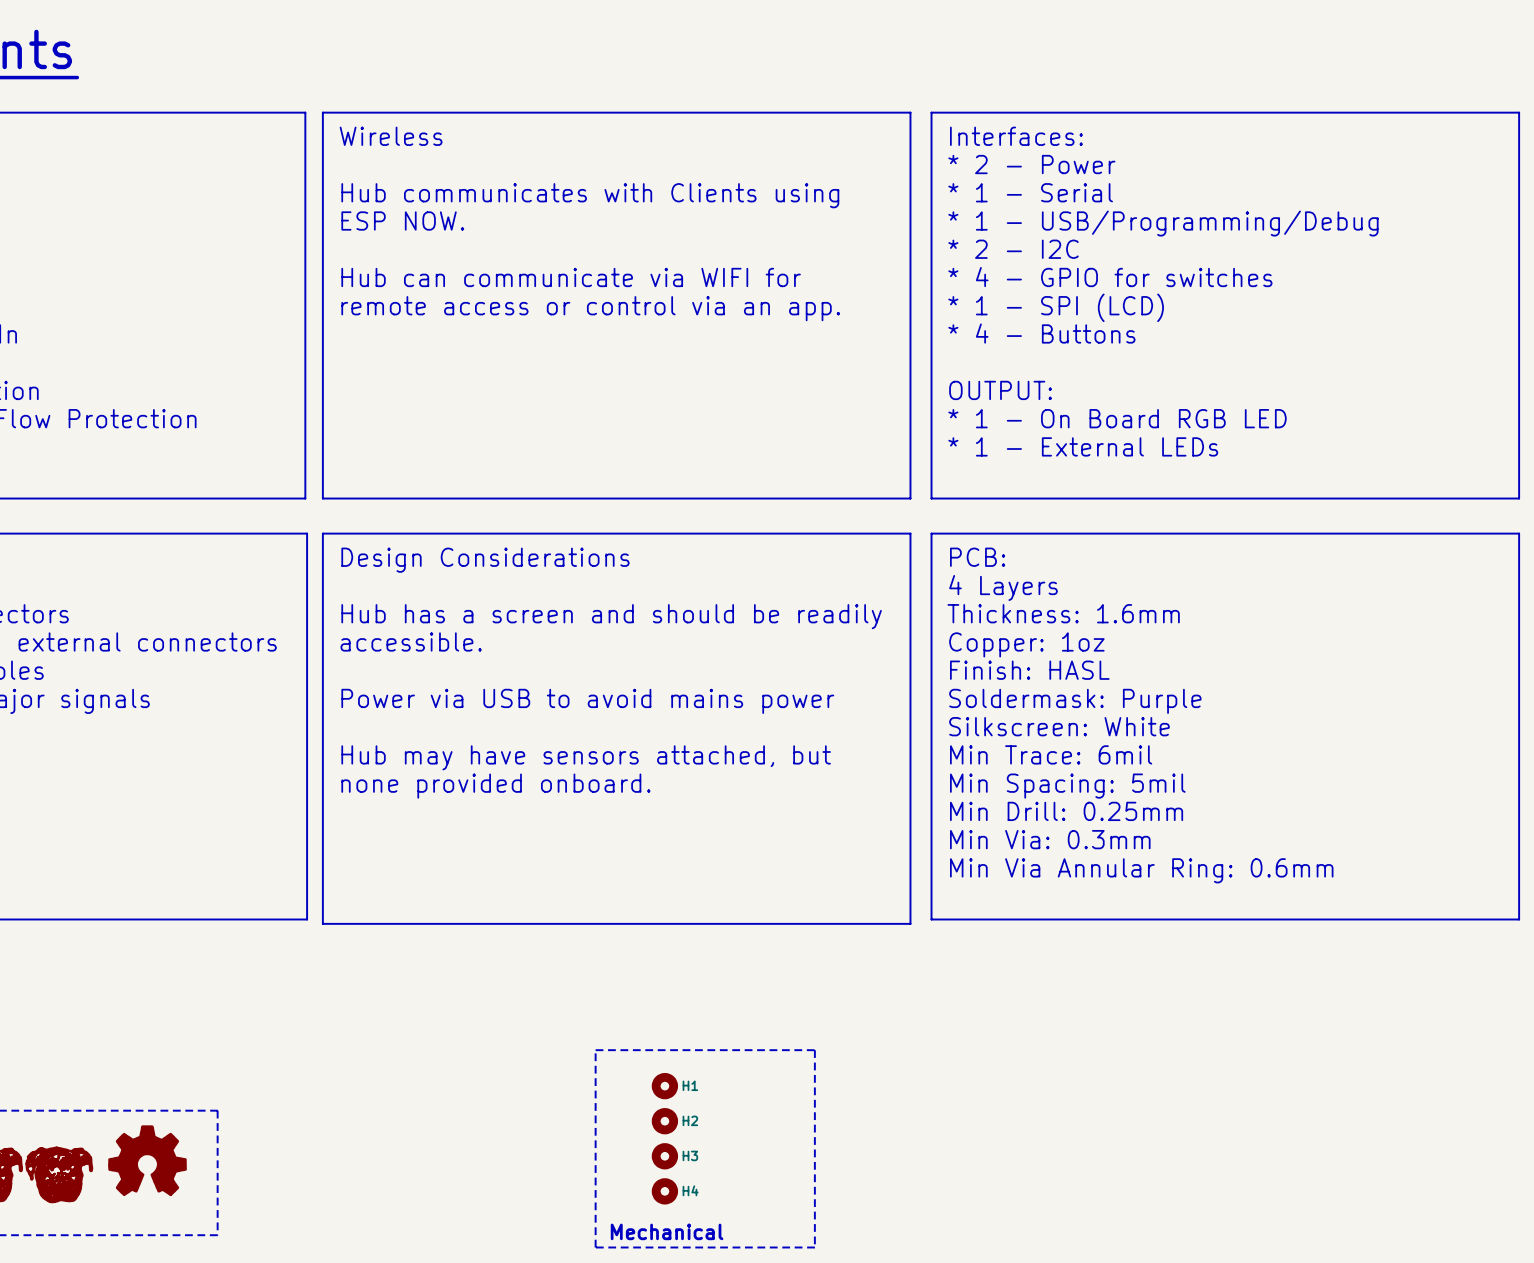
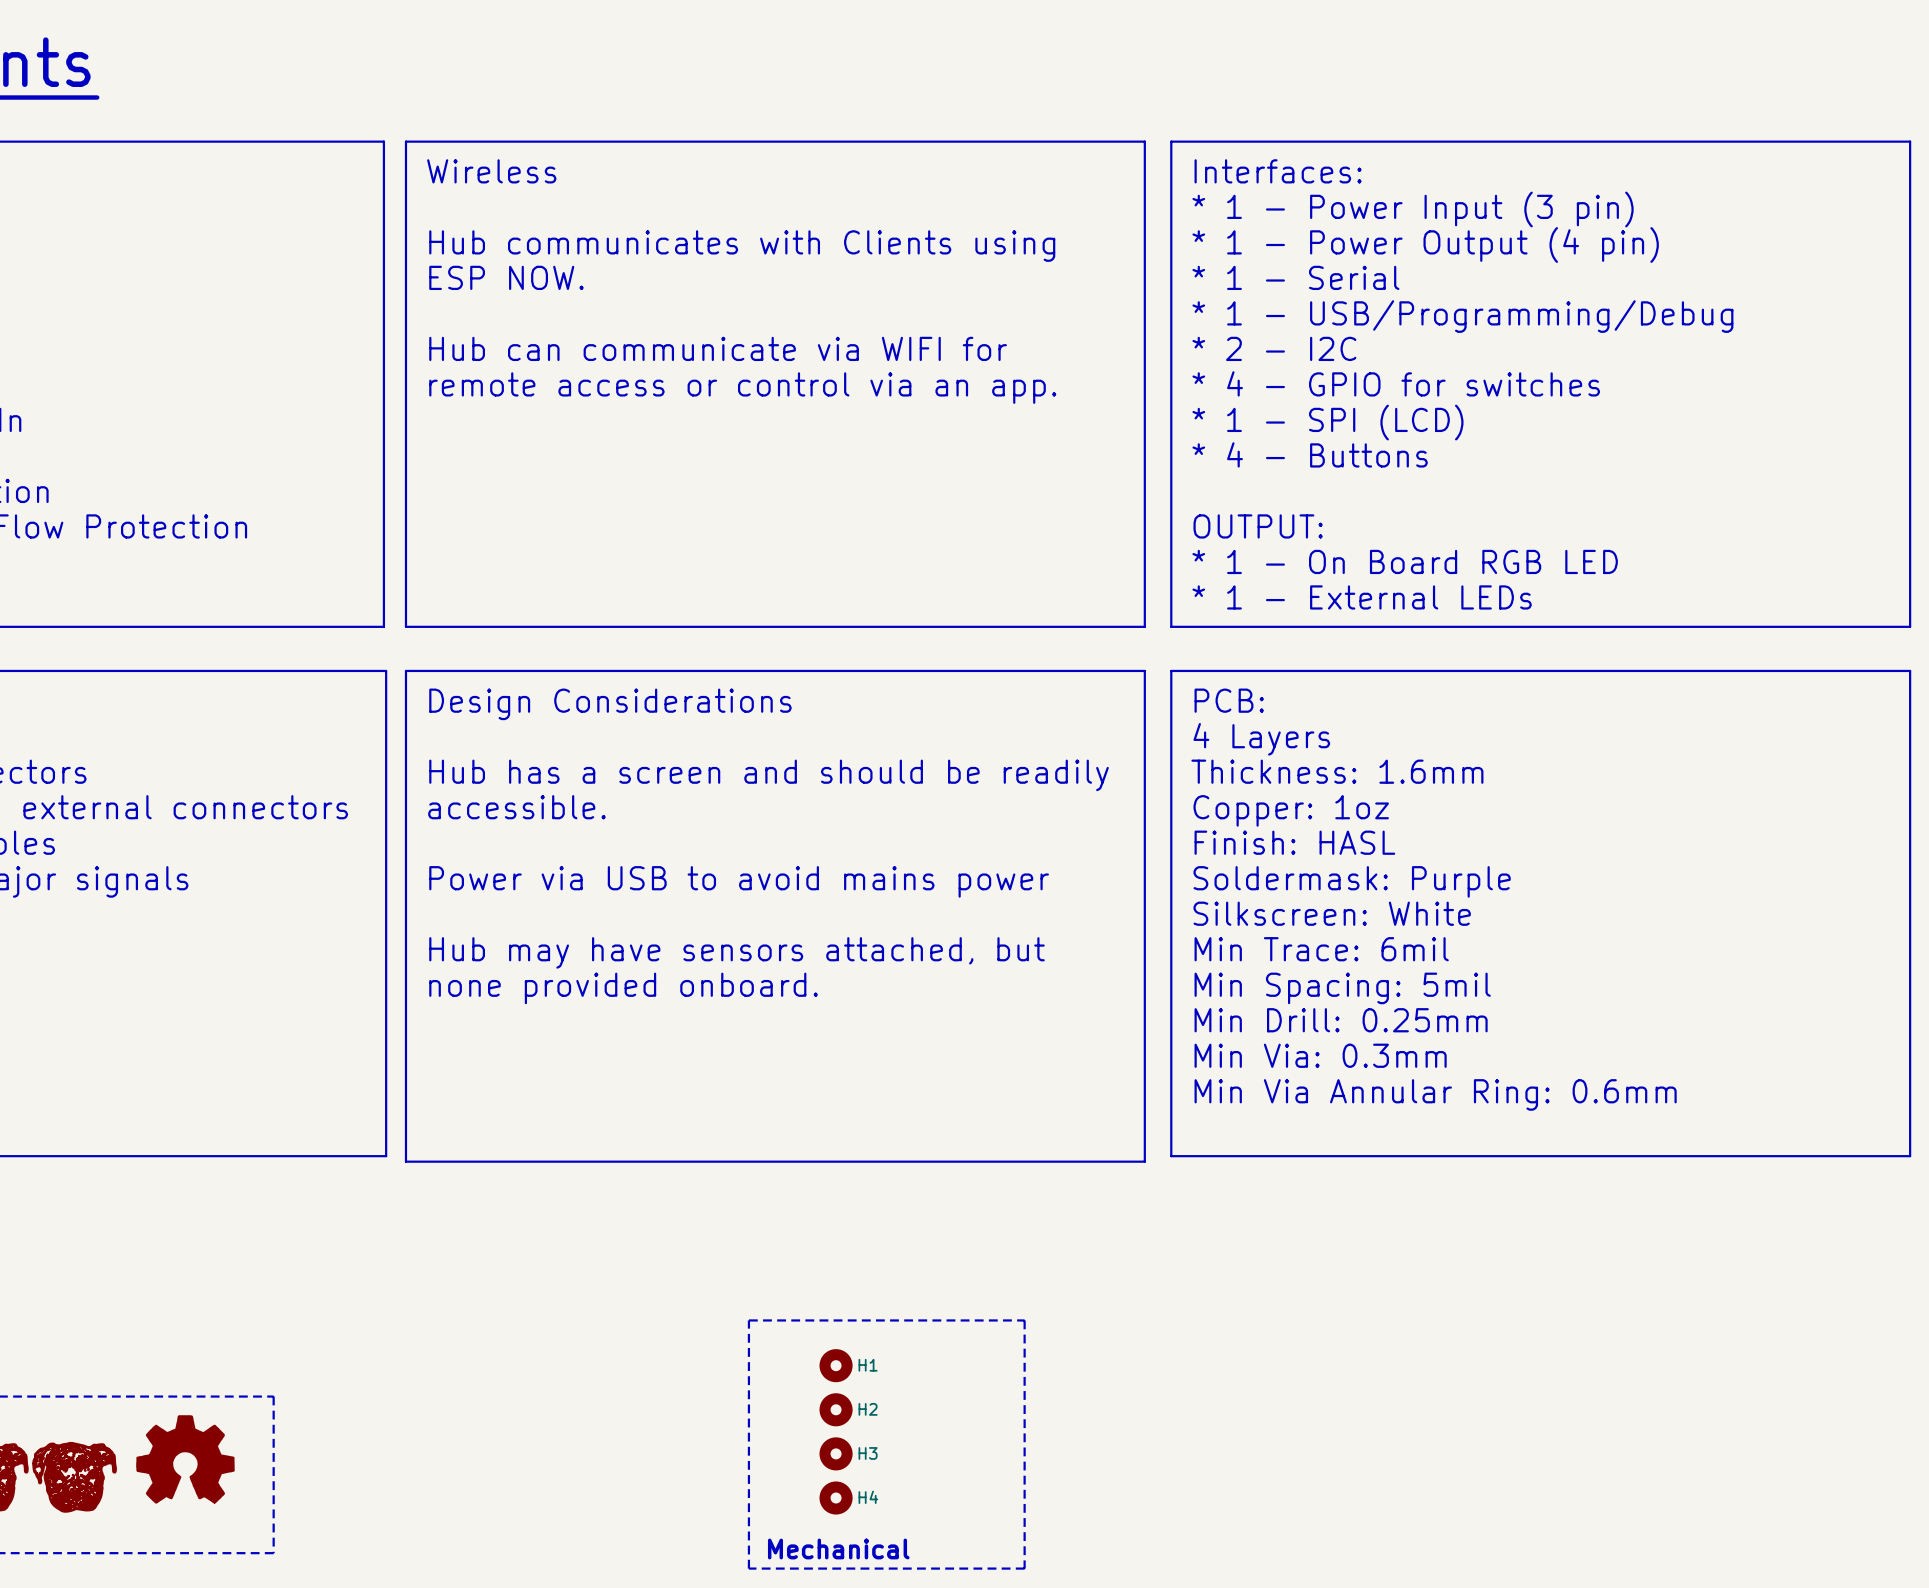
text: * 2 - Power (1031, 164) -> * 1 - Power Input (3 pin) (1413, 209)
text: * 1 - Serial (1030, 192) -> * 1 - Power Output (4 pin) (1425, 245)
text: * 1 - USB/Programming/Debug (1163, 223) -> * 1 - Serial (1295, 277)
text: * 2 - I2C (1013, 249) -> * 1 - USB/Programming/Debug (1462, 316)
text: * 4 - GPIO for switches (1110, 277) -> * 2 - I2C (1274, 348)
text: * 1 - SPI (LCD) (1056, 307) -> * 4 - GPIO for switches (1396, 383)
text: * 4 - Buttons (1041, 333) -> * 1 - SPI (LCD) (1327, 422)
text: none -> * 4 - Buttons (1310, 454)
text: OUTPUT: (1000, 390) -> none
text: * 1 - On Board RGB LED (1117, 418) -> OUTPUT: (1258, 526)
text: * 1 - External LEDs (1083, 446) -> * 1 - On Board RGB LED (1405, 561)
text: none -> * 1 - External LEDs (1362, 597)

